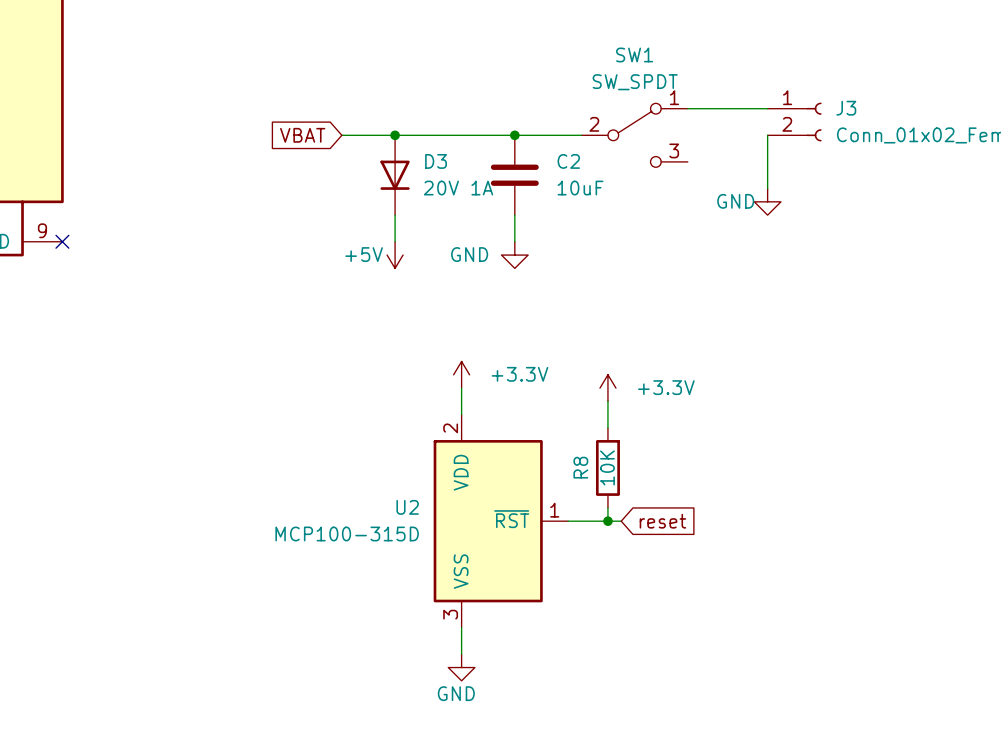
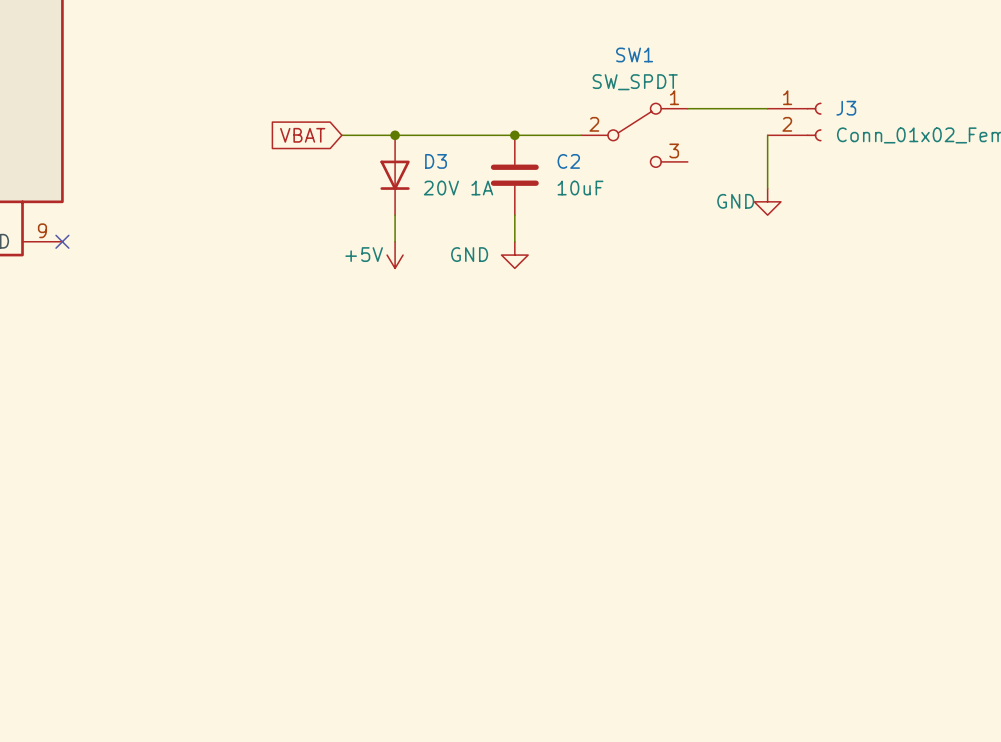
power symbol: +3.3V (461, 374) -> none
wire: (461, 388) (461, 414) -> none
power symbol: +3.3V (607, 388) -> none
wire: (607, 401) (607, 428) -> none
R8: 10K (607, 467) -> none
wire: (607, 507) (607, 521) -> none
U2: MCP100-315D (500, 521) -> none
wire: (568, 521) (621, 521) -> none
junction: (607, 521) -> none
global label: reset (662, 521) -> none
wire: (461, 627) (461, 654) -> none
power symbol: GND (461, 667) -> none

